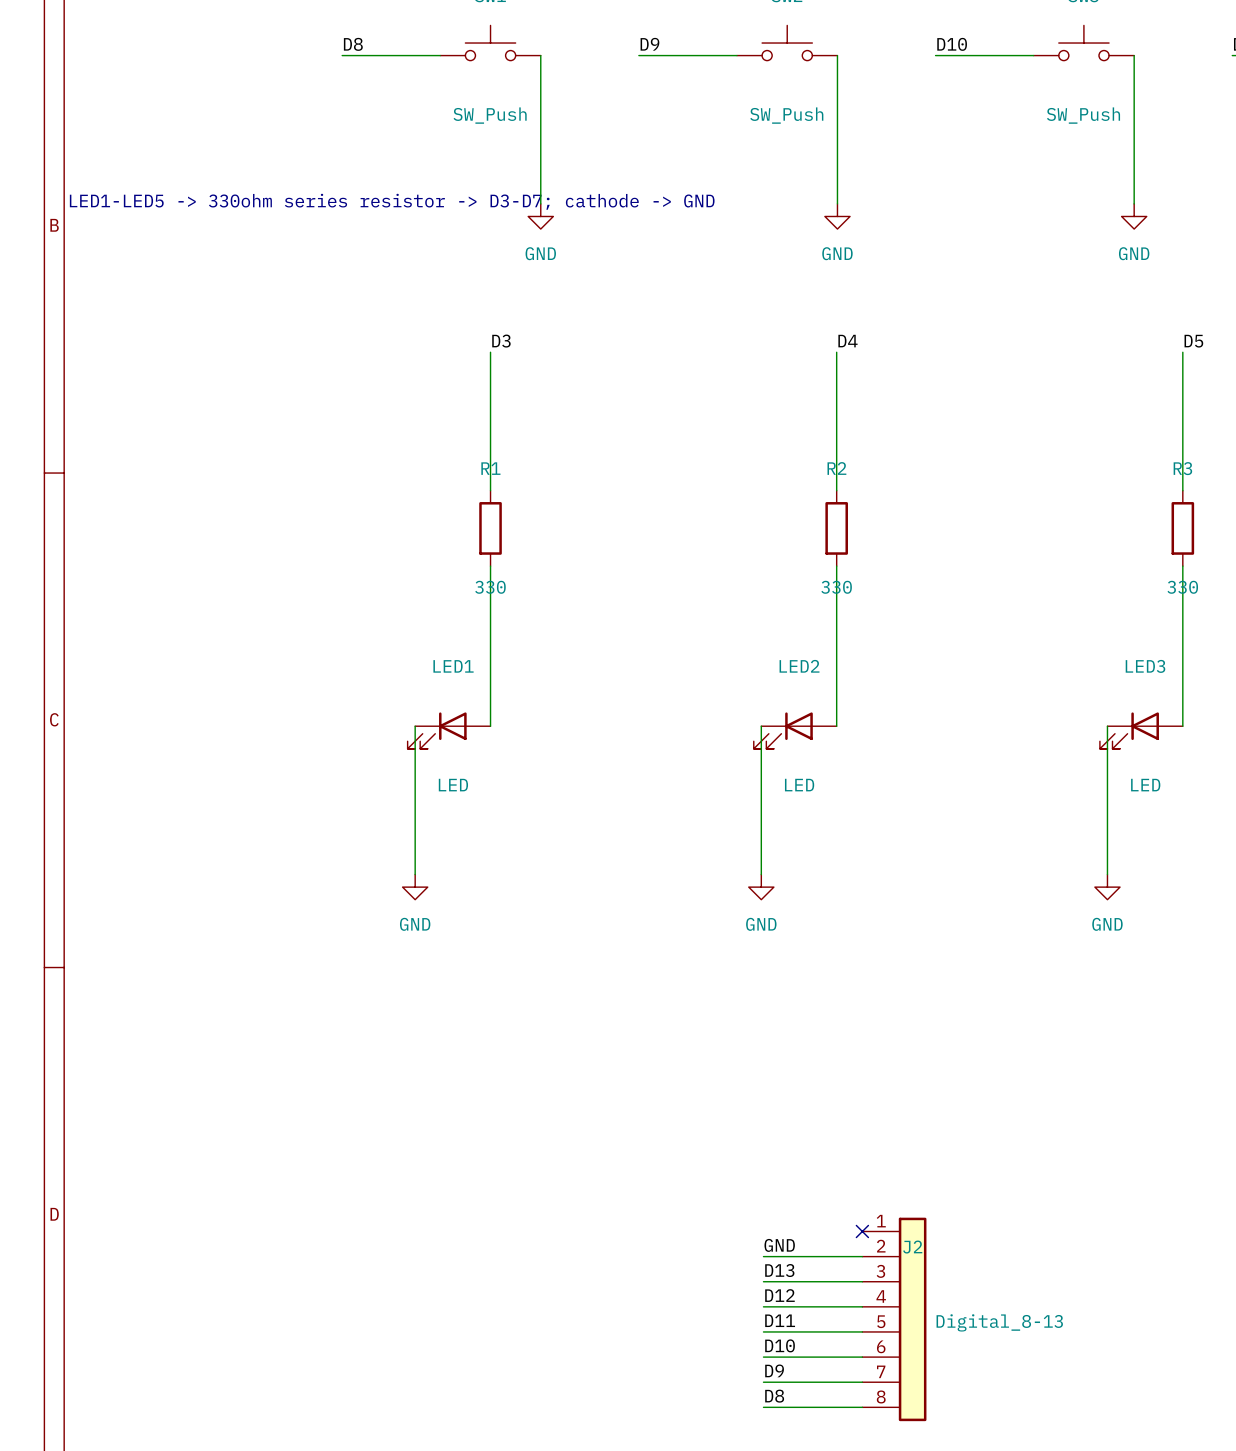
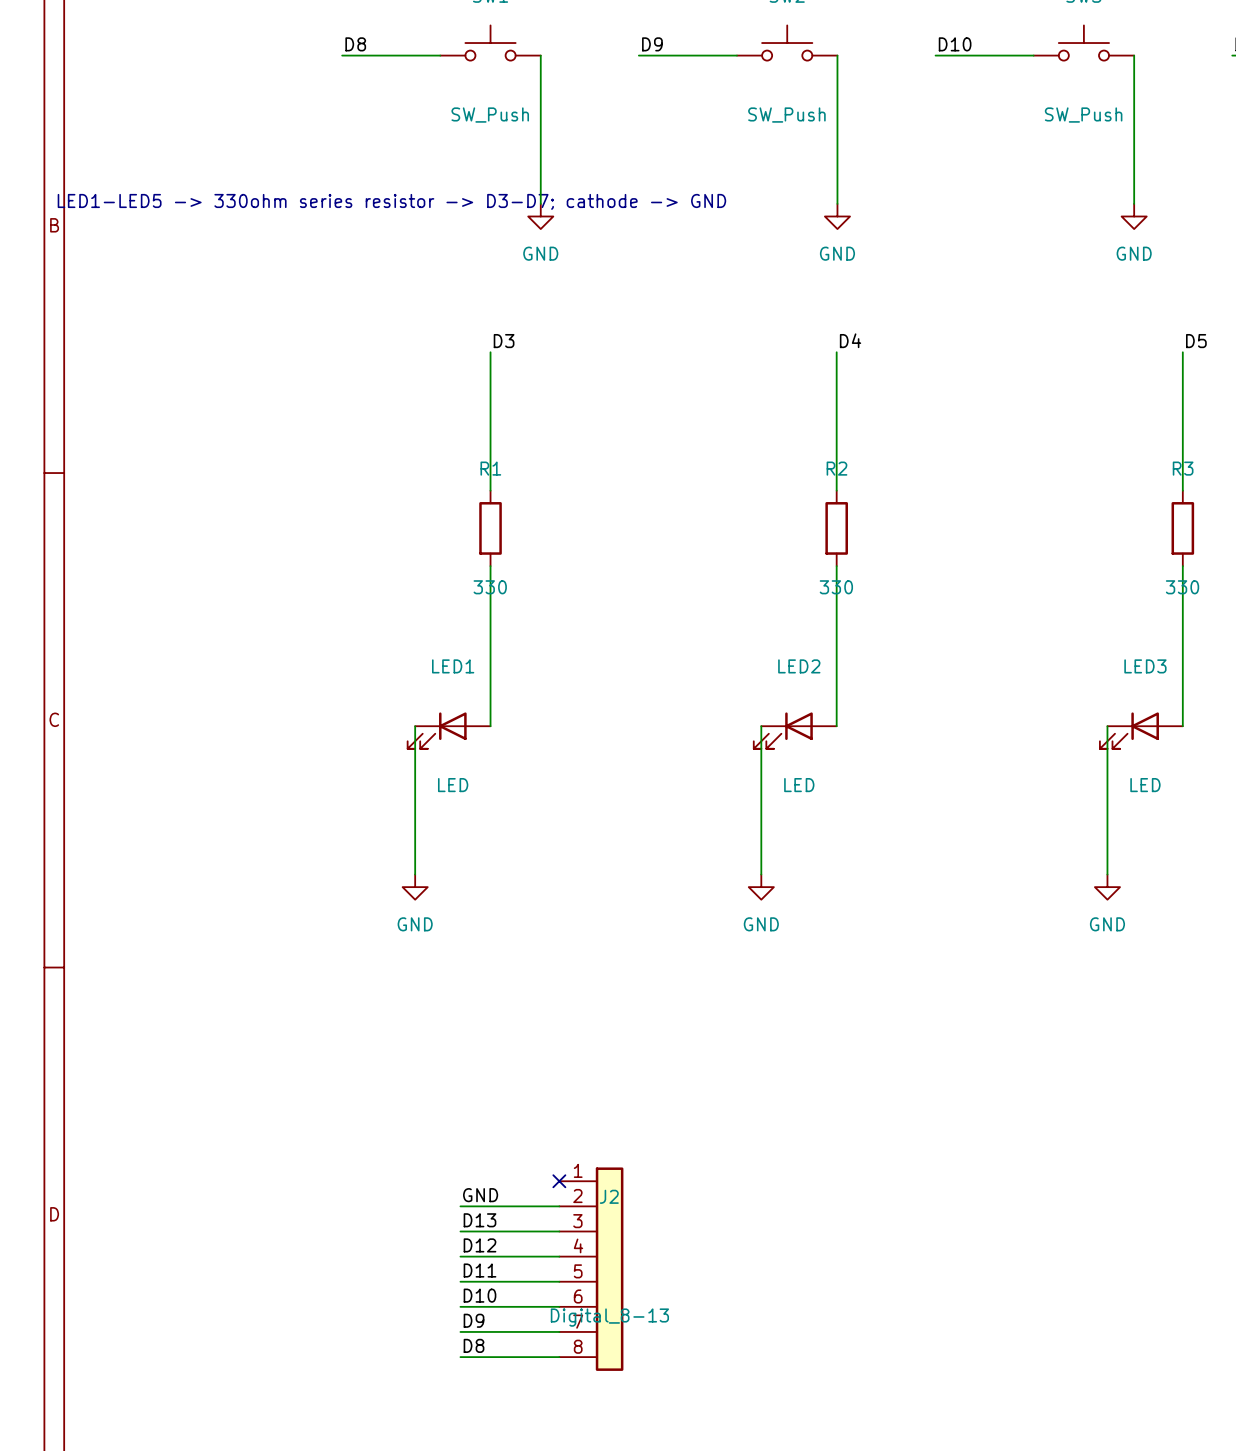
no-connect mark: none -> (559, 1181)
label: none -> GND (480, 1195)
wire: none -> (460, 1206) (559, 1206)
label: none -> D13 (479, 1220)
wire: none -> (460, 1231) (559, 1231)
no-connect mark: (862, 1231) -> none
label: none -> D12 (479, 1245)
label: GND (779, 1245) -> none
wire: none -> (460, 1256) (559, 1256)
wire: (763, 1256) (862, 1256) -> none
label: none -> D11 (479, 1270)
label: D13 (779, 1270) -> none
wire: none -> (460, 1281) (559, 1281)
wire: (763, 1281) (862, 1281) -> none
label: none -> D10 (479, 1295)
label: D12 (779, 1295) -> none
wire: none -> (460, 1306) (559, 1306)
wire: (763, 1306) (862, 1306) -> none
J2 position: (894, 1319) -> (591, 1269)
label: none -> D9 (474, 1320)
label: D11 (780, 1320) -> none
J2 value position: Digital_8-13 (999, 1322) -> Digital_8-13 (609, 1317)
wire: none -> (460, 1331) (559, 1331)
wire: (763, 1331) (862, 1331) -> none
label: none -> D8 (474, 1345)
label: D10 (780, 1345) -> none
wire: none -> (460, 1357) (559, 1357)
wire: (763, 1357) (862, 1357) -> none
label: D9 (774, 1370) -> none
wire: (763, 1382) (862, 1382) -> none
label: D8 (774, 1396) -> none
wire: (763, 1407) (862, 1407) -> none

